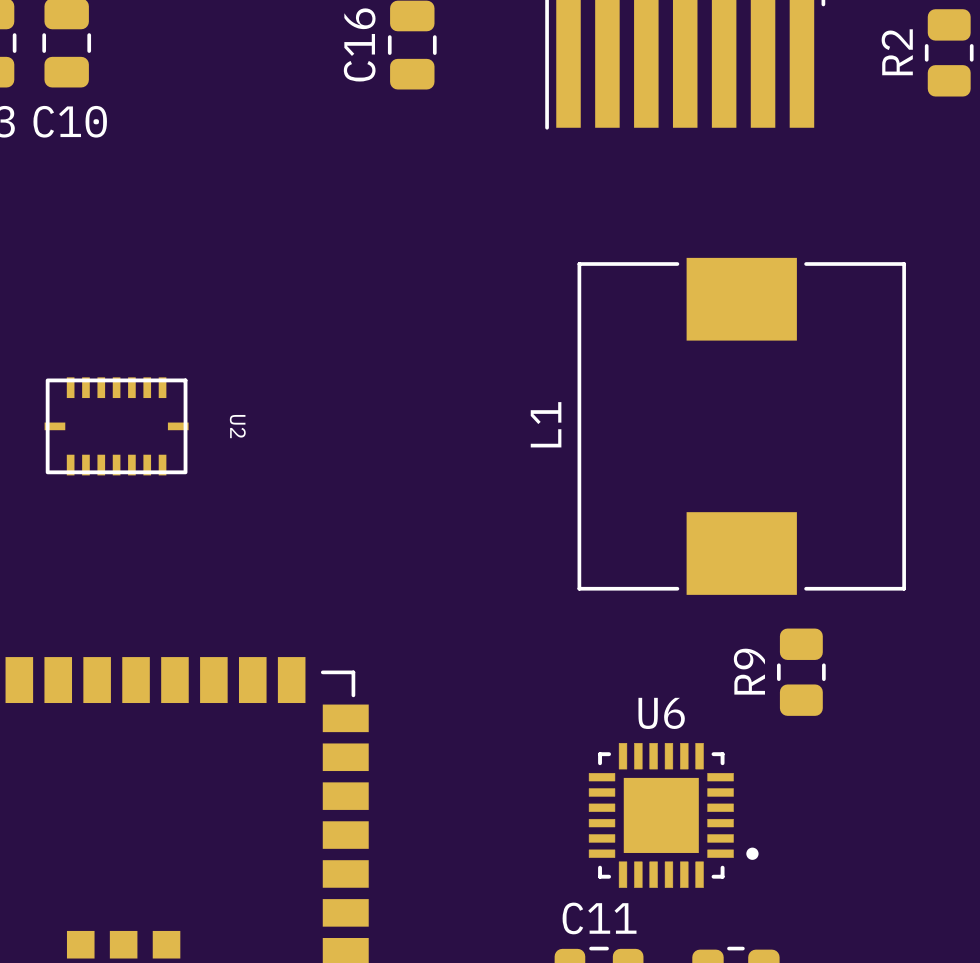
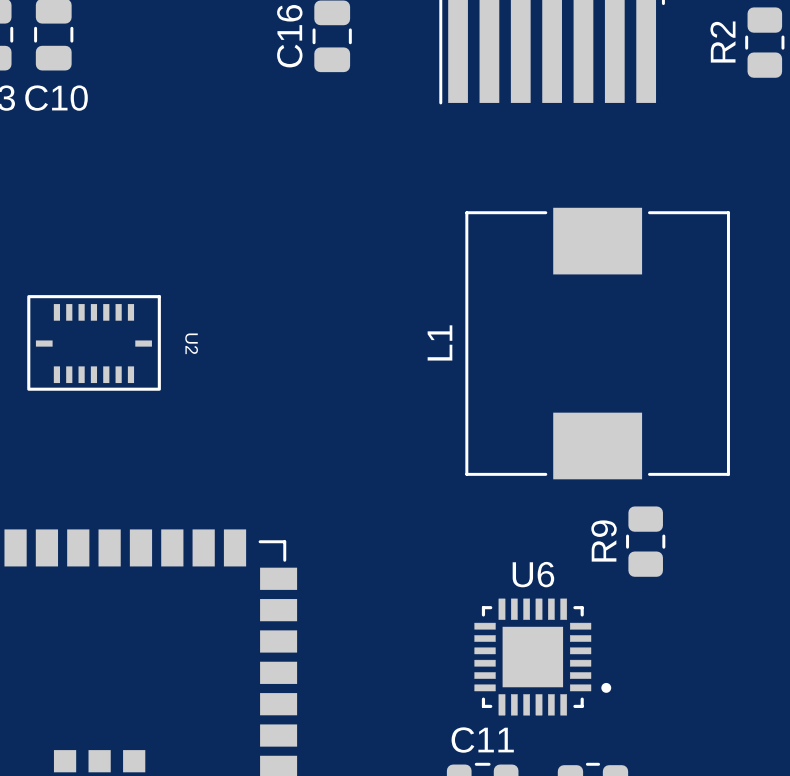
U2 footprint: [44, 377, 189, 476] -> [27, 295, 161, 391]

